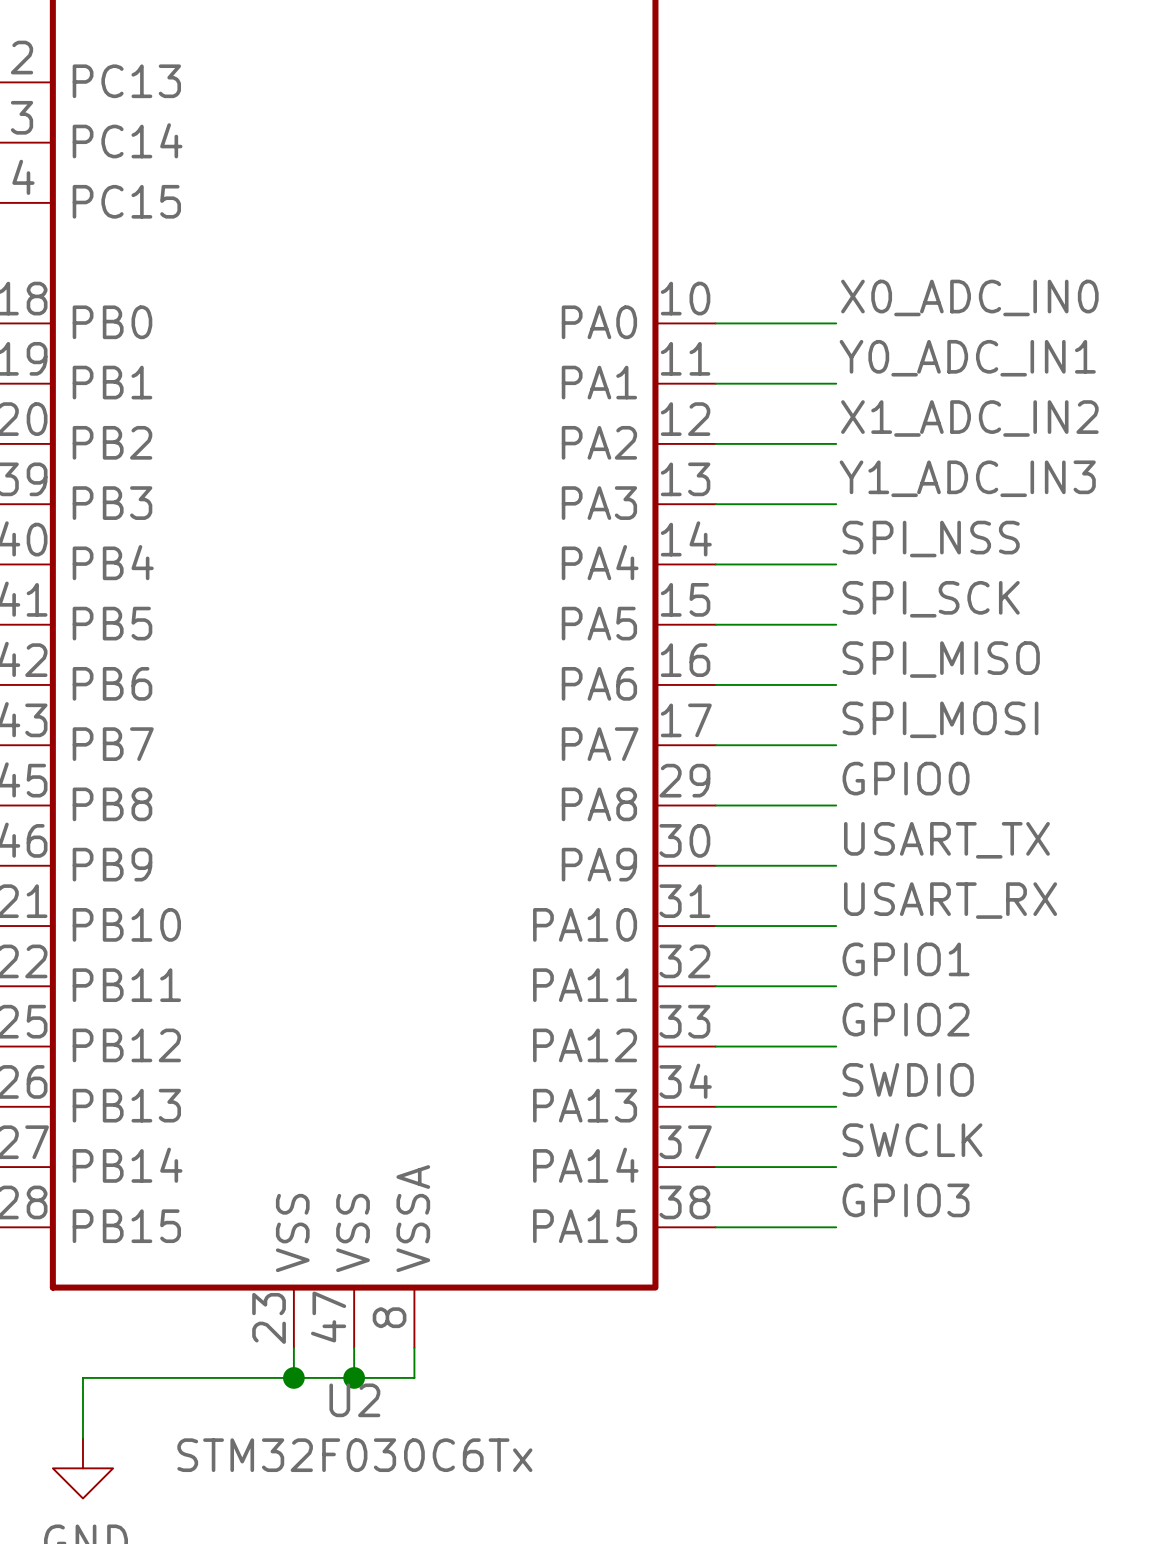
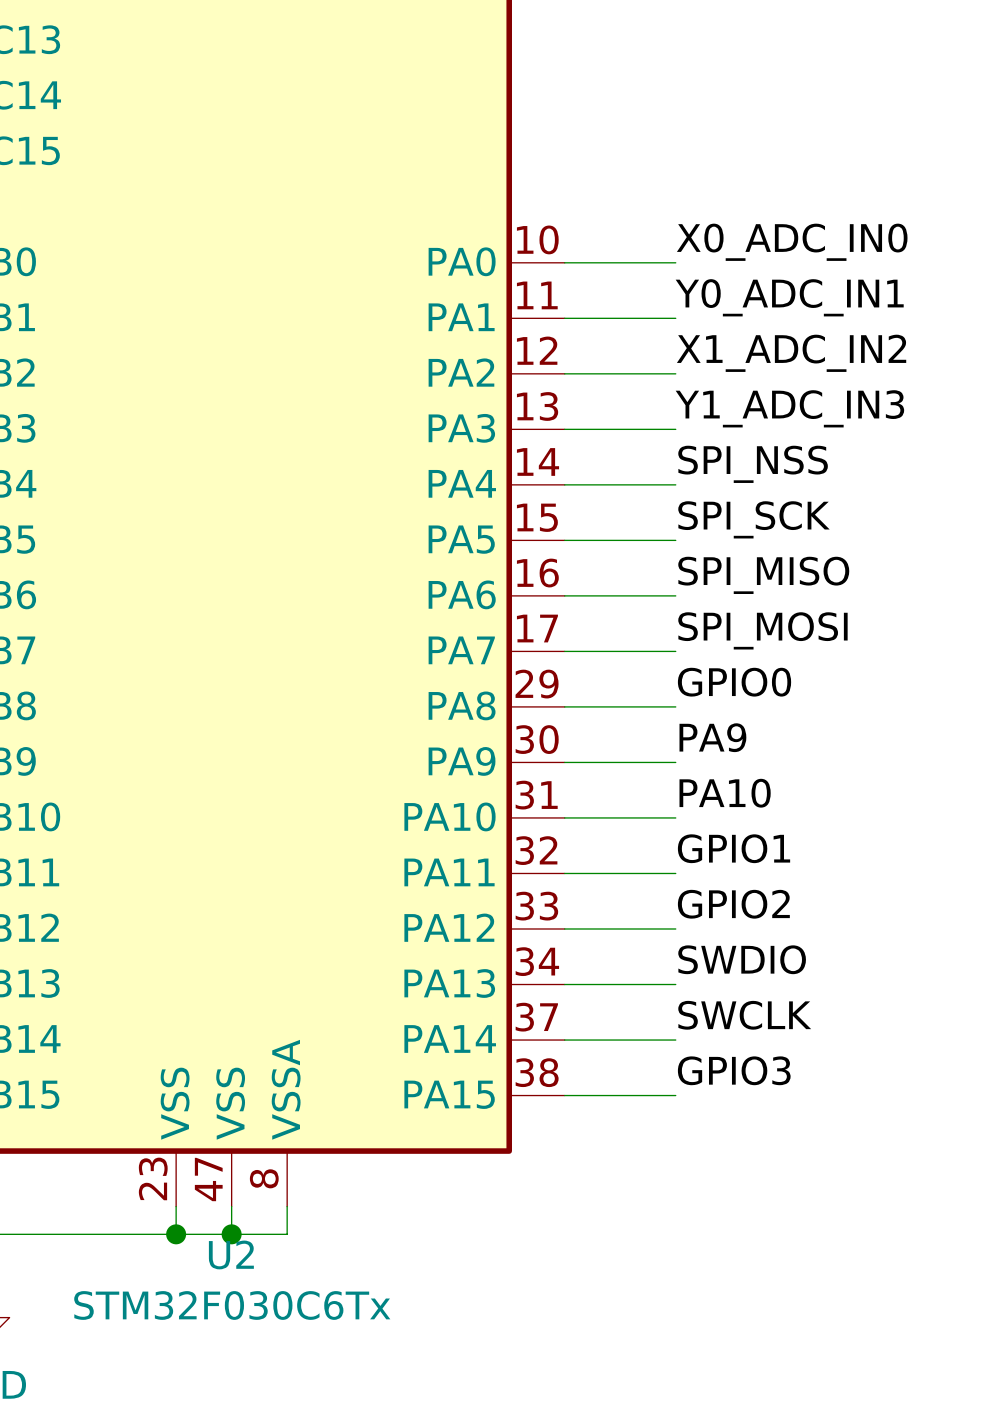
label: USART_TX (946, 840) -> PA9 (712, 737)
label: USART_RX (950, 900) -> PA10 (725, 793)

